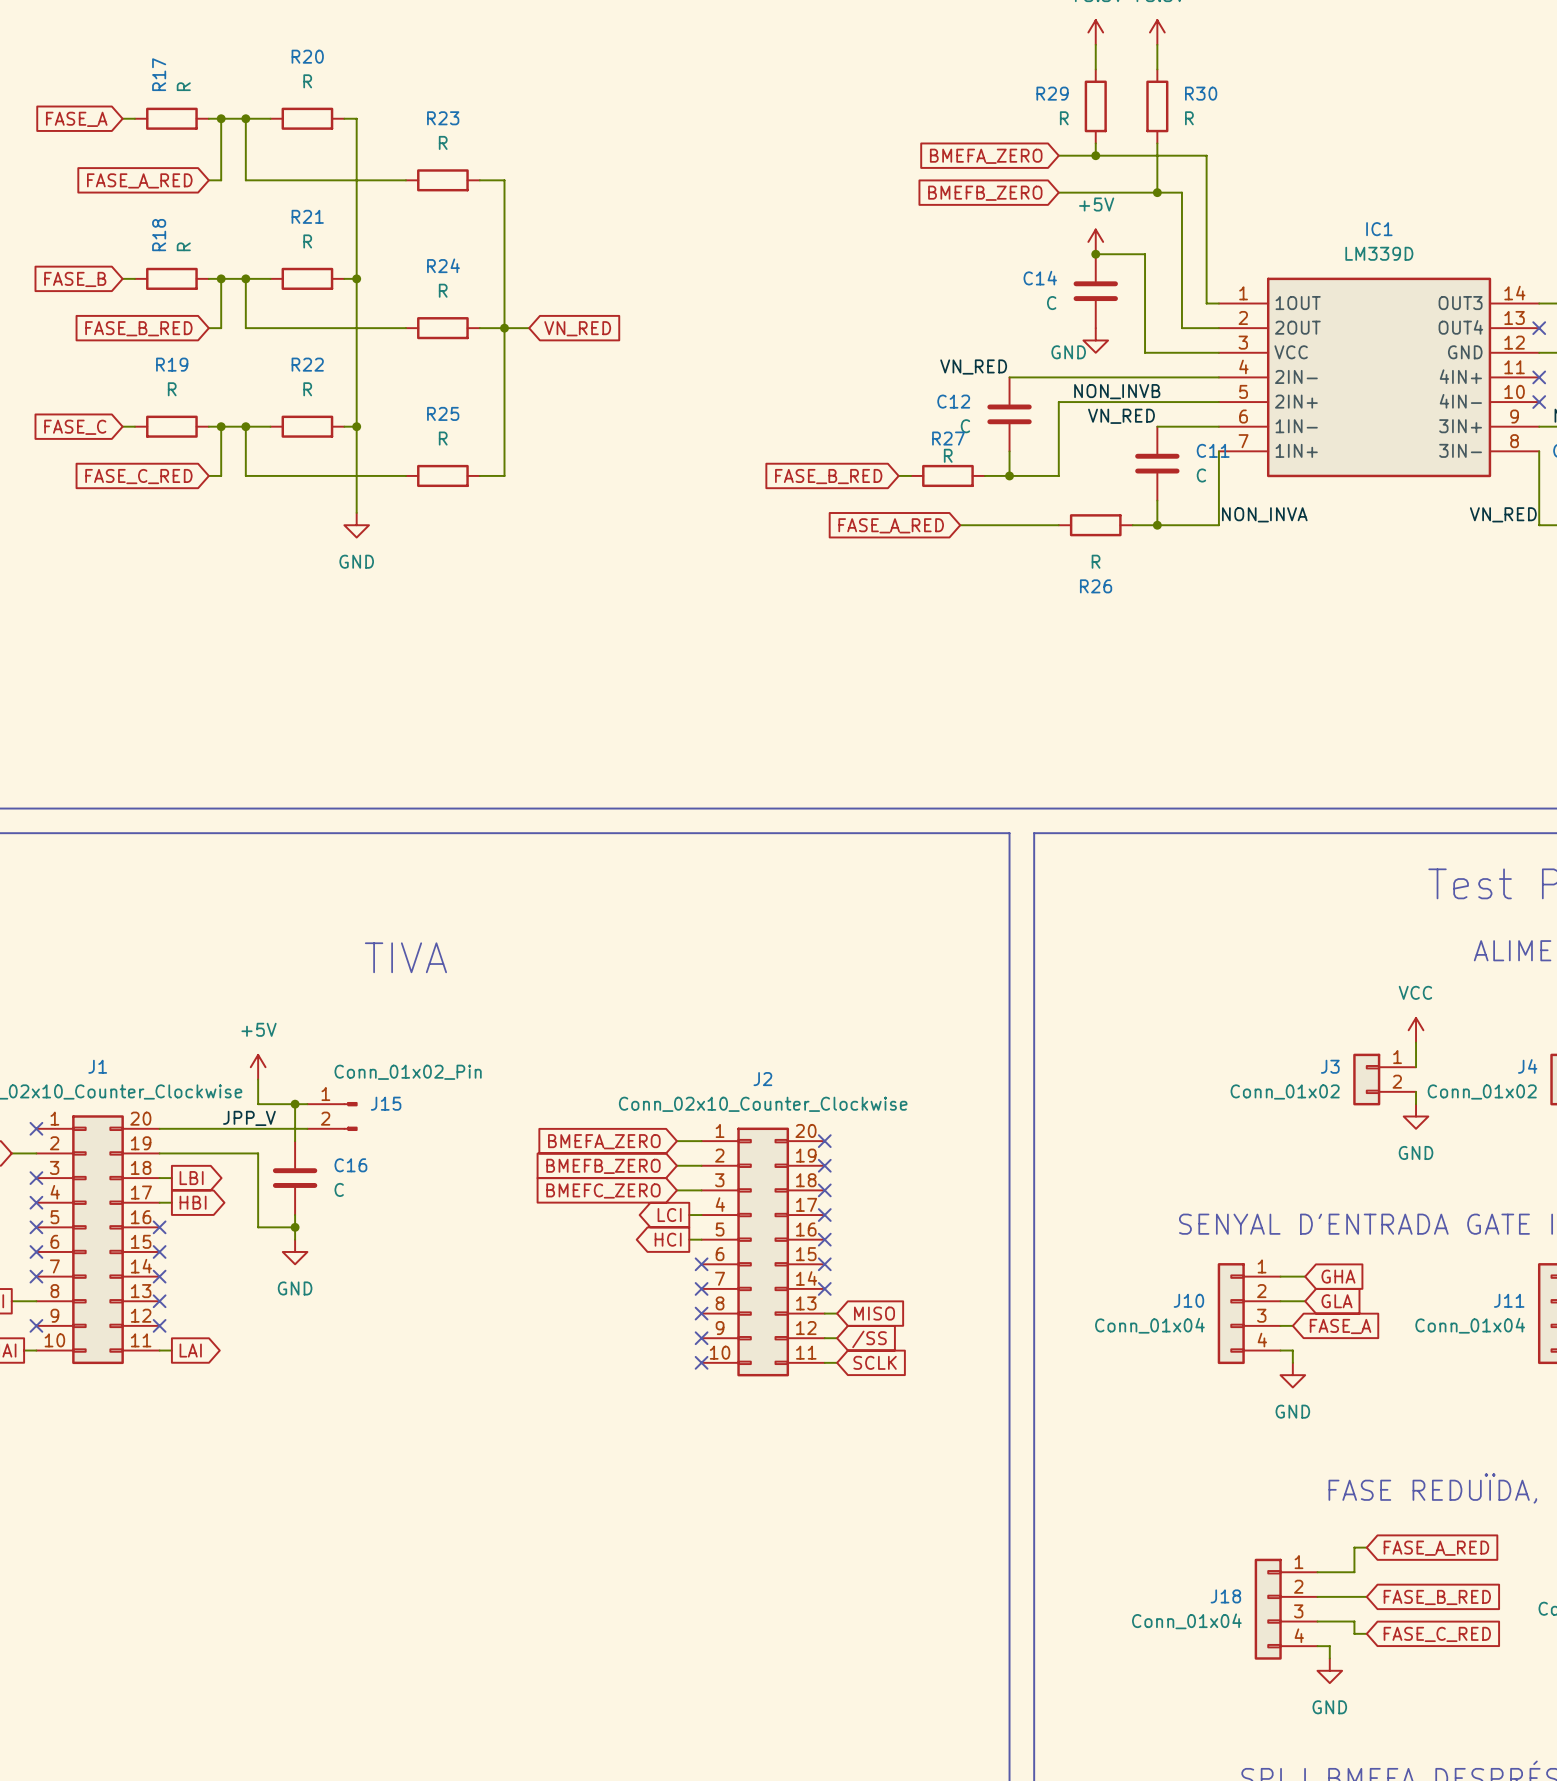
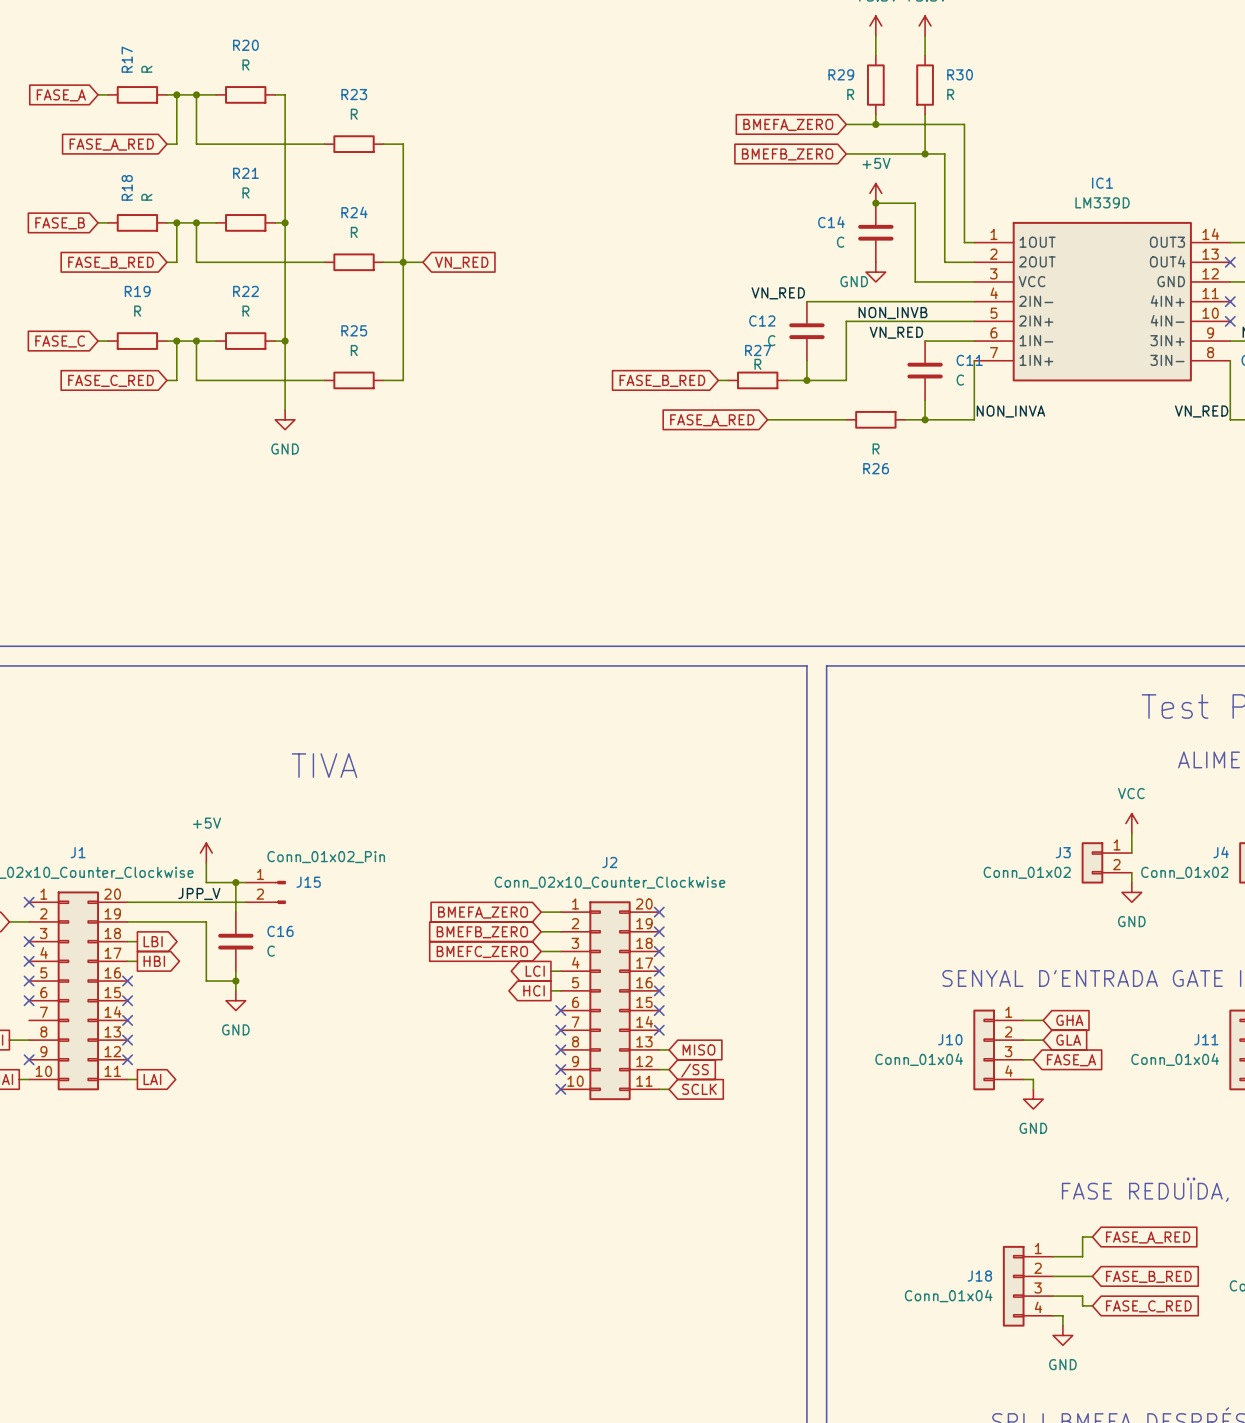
no-connect mark: (36, 1276) -> none

